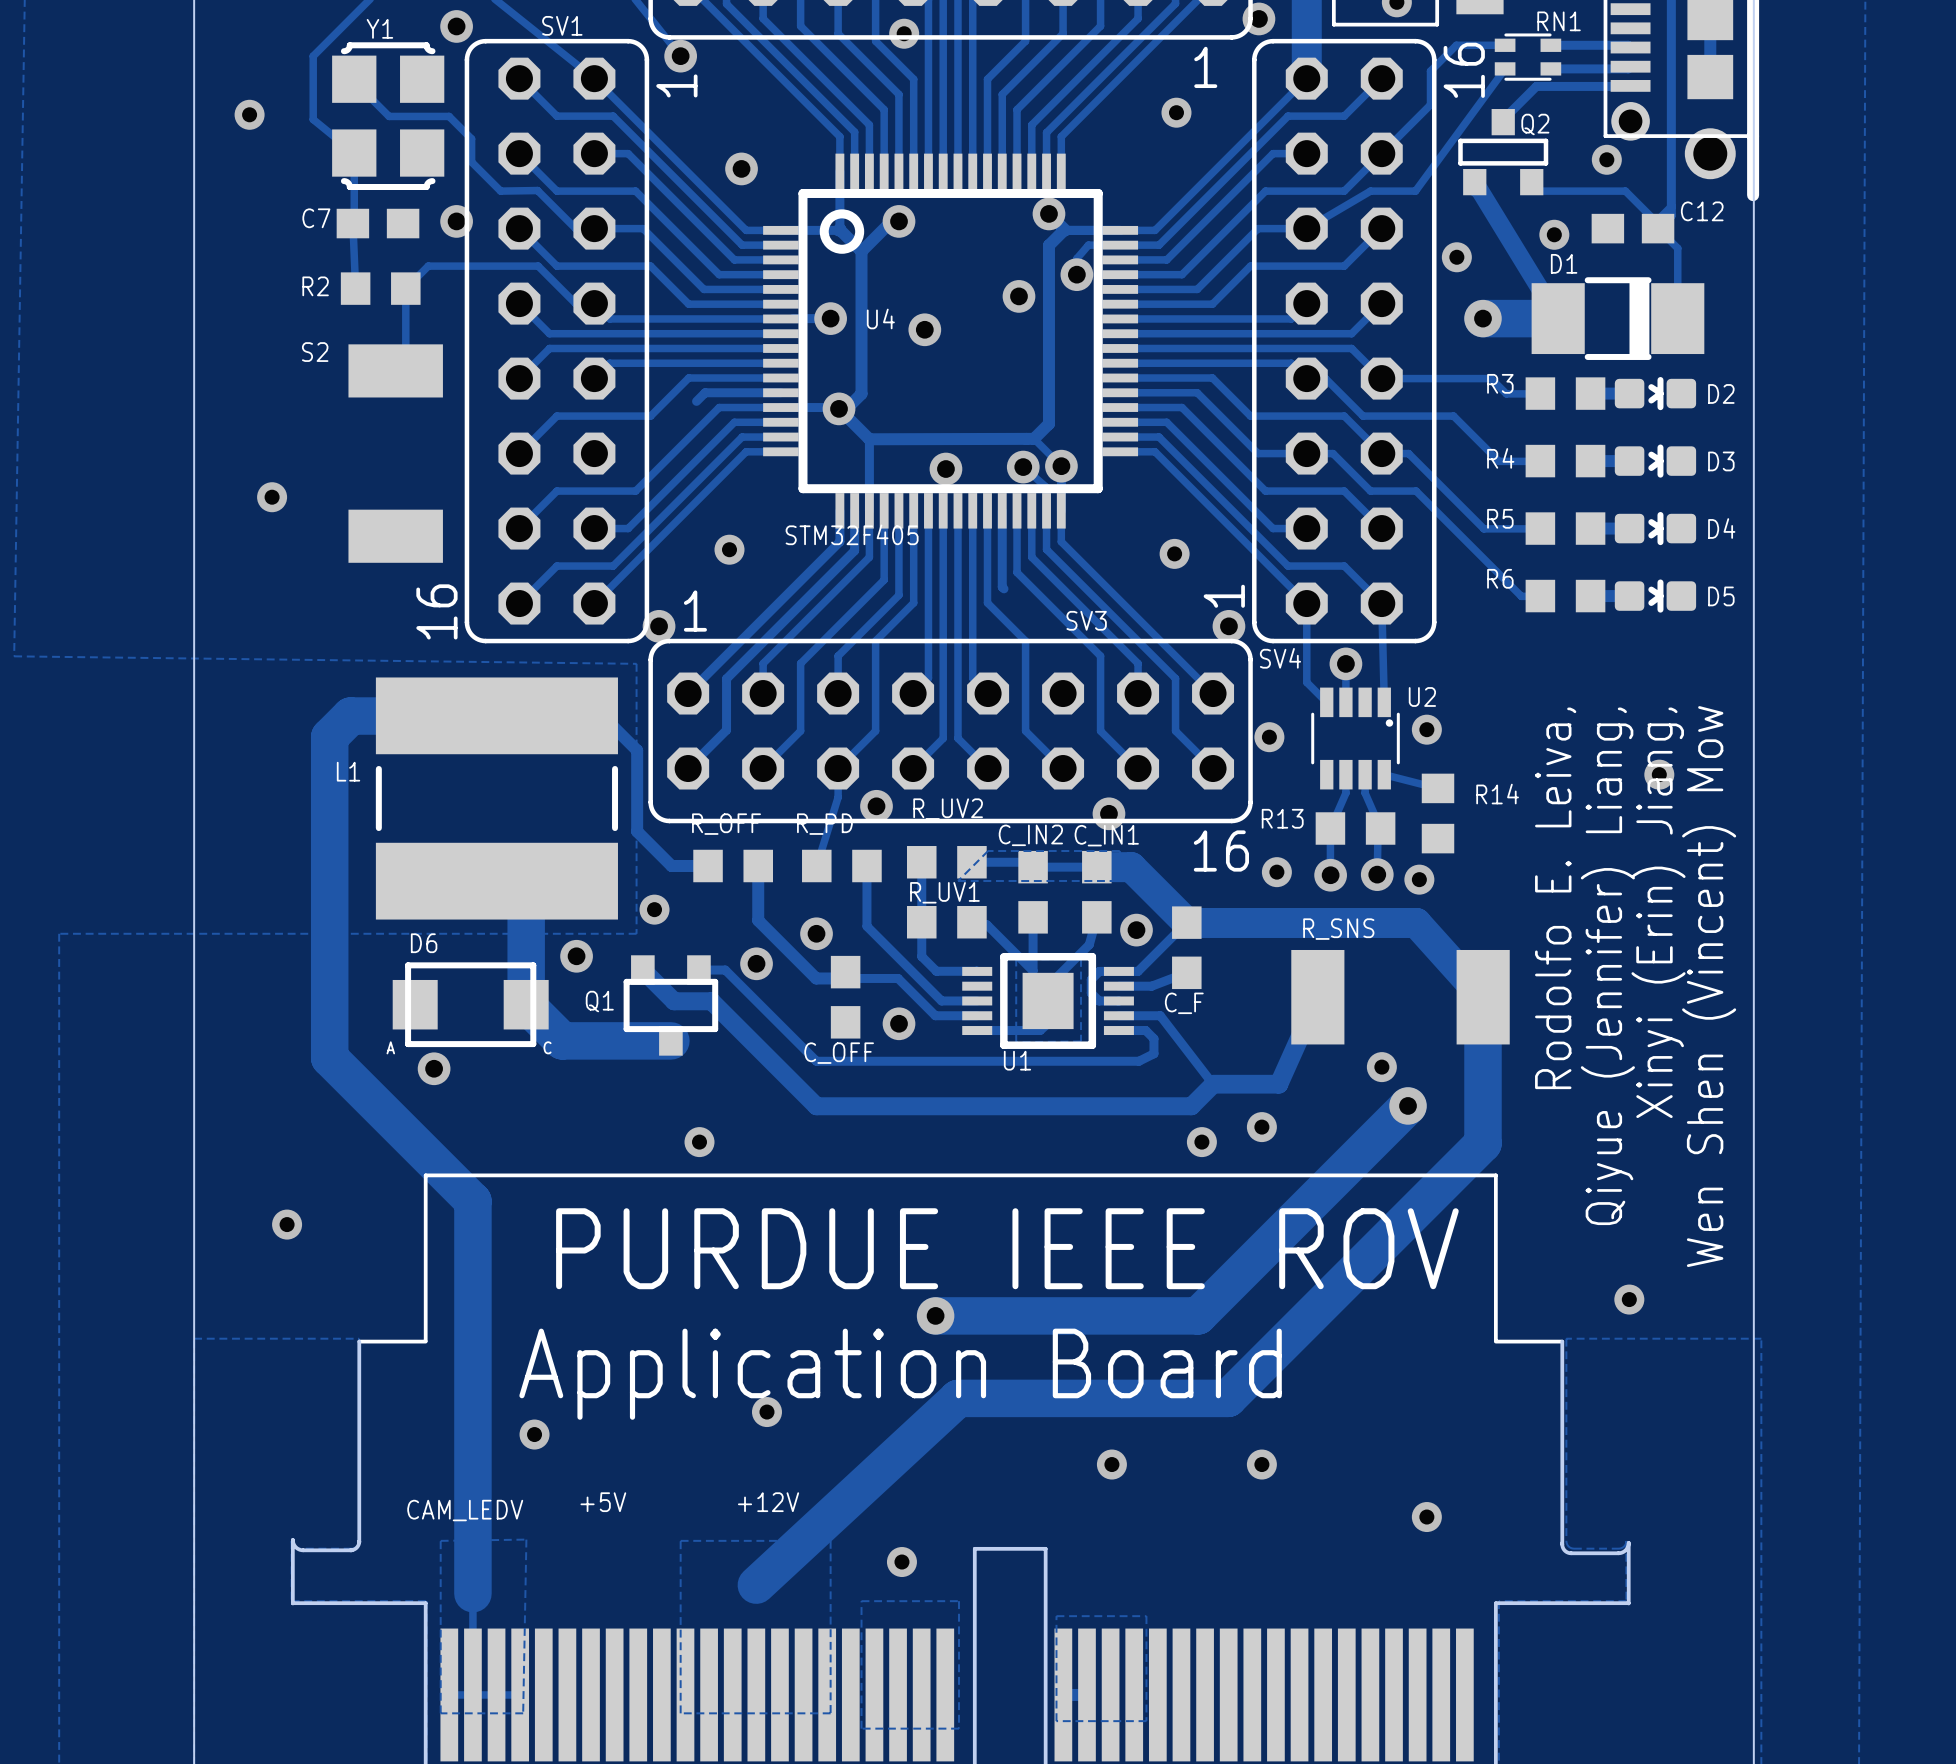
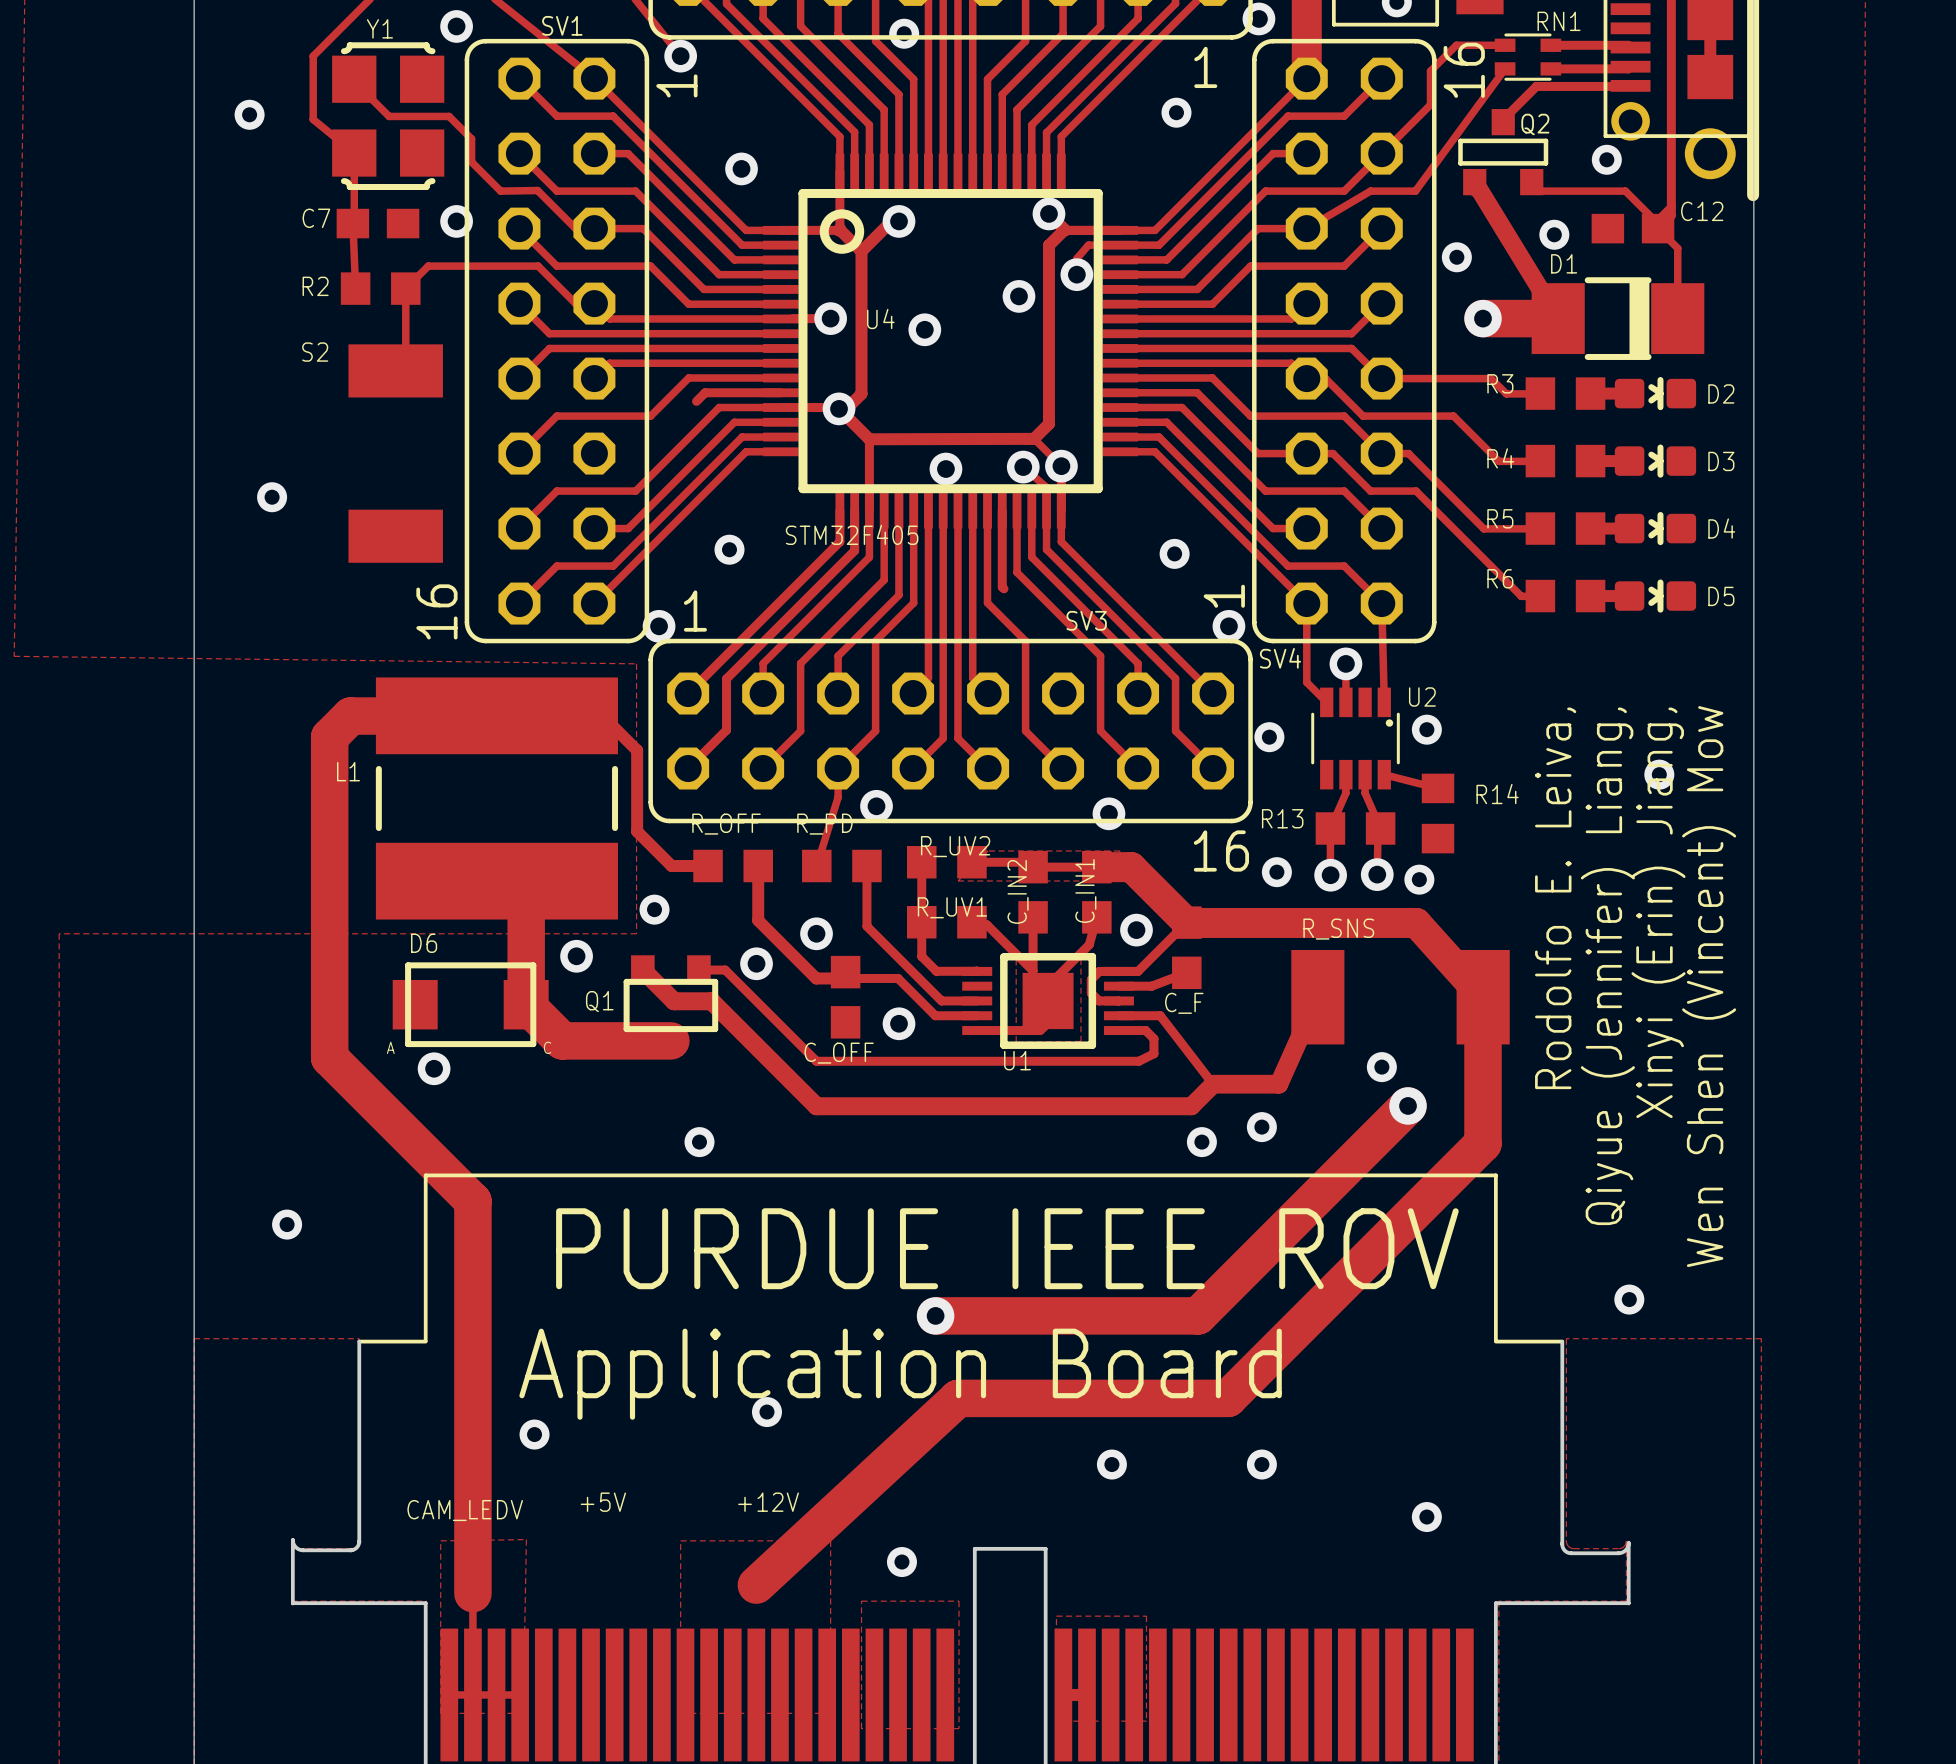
R_UV2 name position: R_UV2 (948, 809) -> R_UV2 (955, 846)
C_IN2 name rotation: 0° (1030, 835) -> 90° counterclockwise (1018, 891)
text rotation: 0° (1106, 835) -> 90° counterclockwise (1085, 891)
R_UV1 name position: R_UV1 (944, 892) -> R_UV1 (952, 907)

